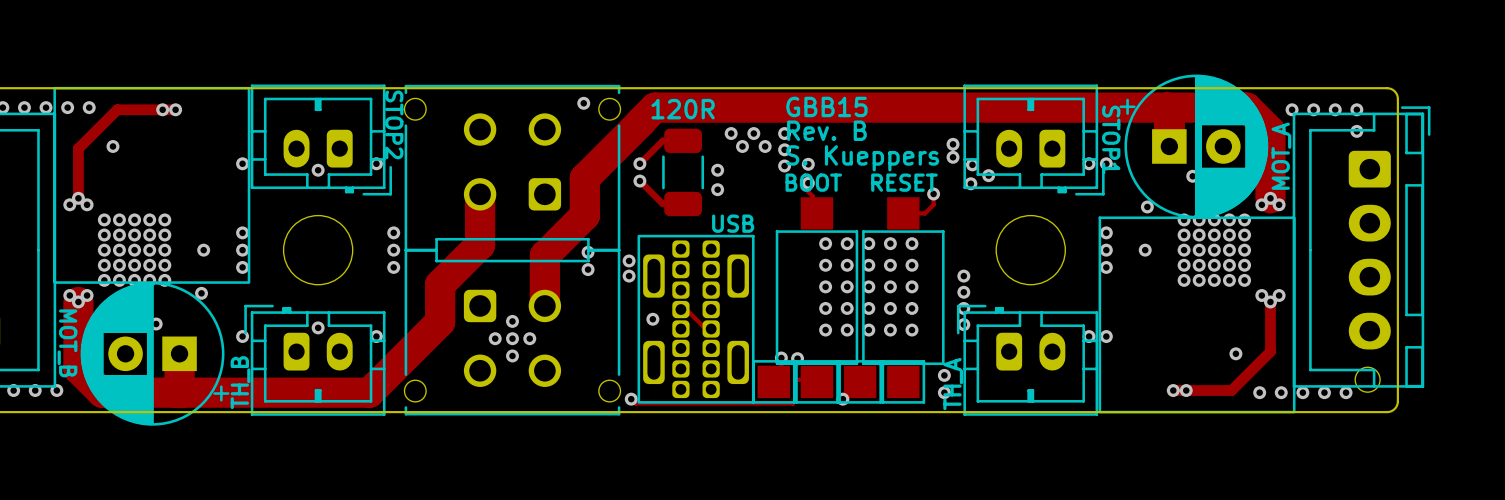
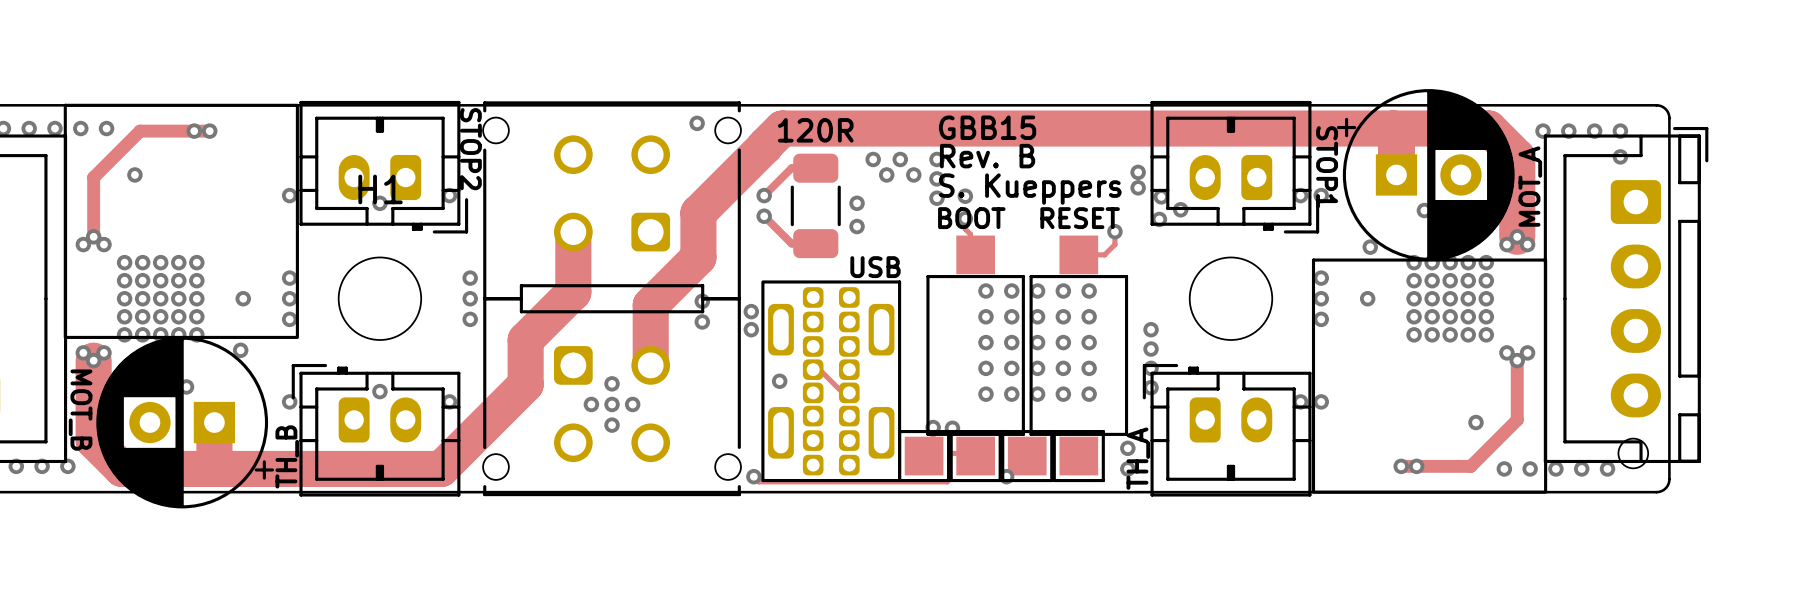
H1 name: none -> H1 (380, 189)

